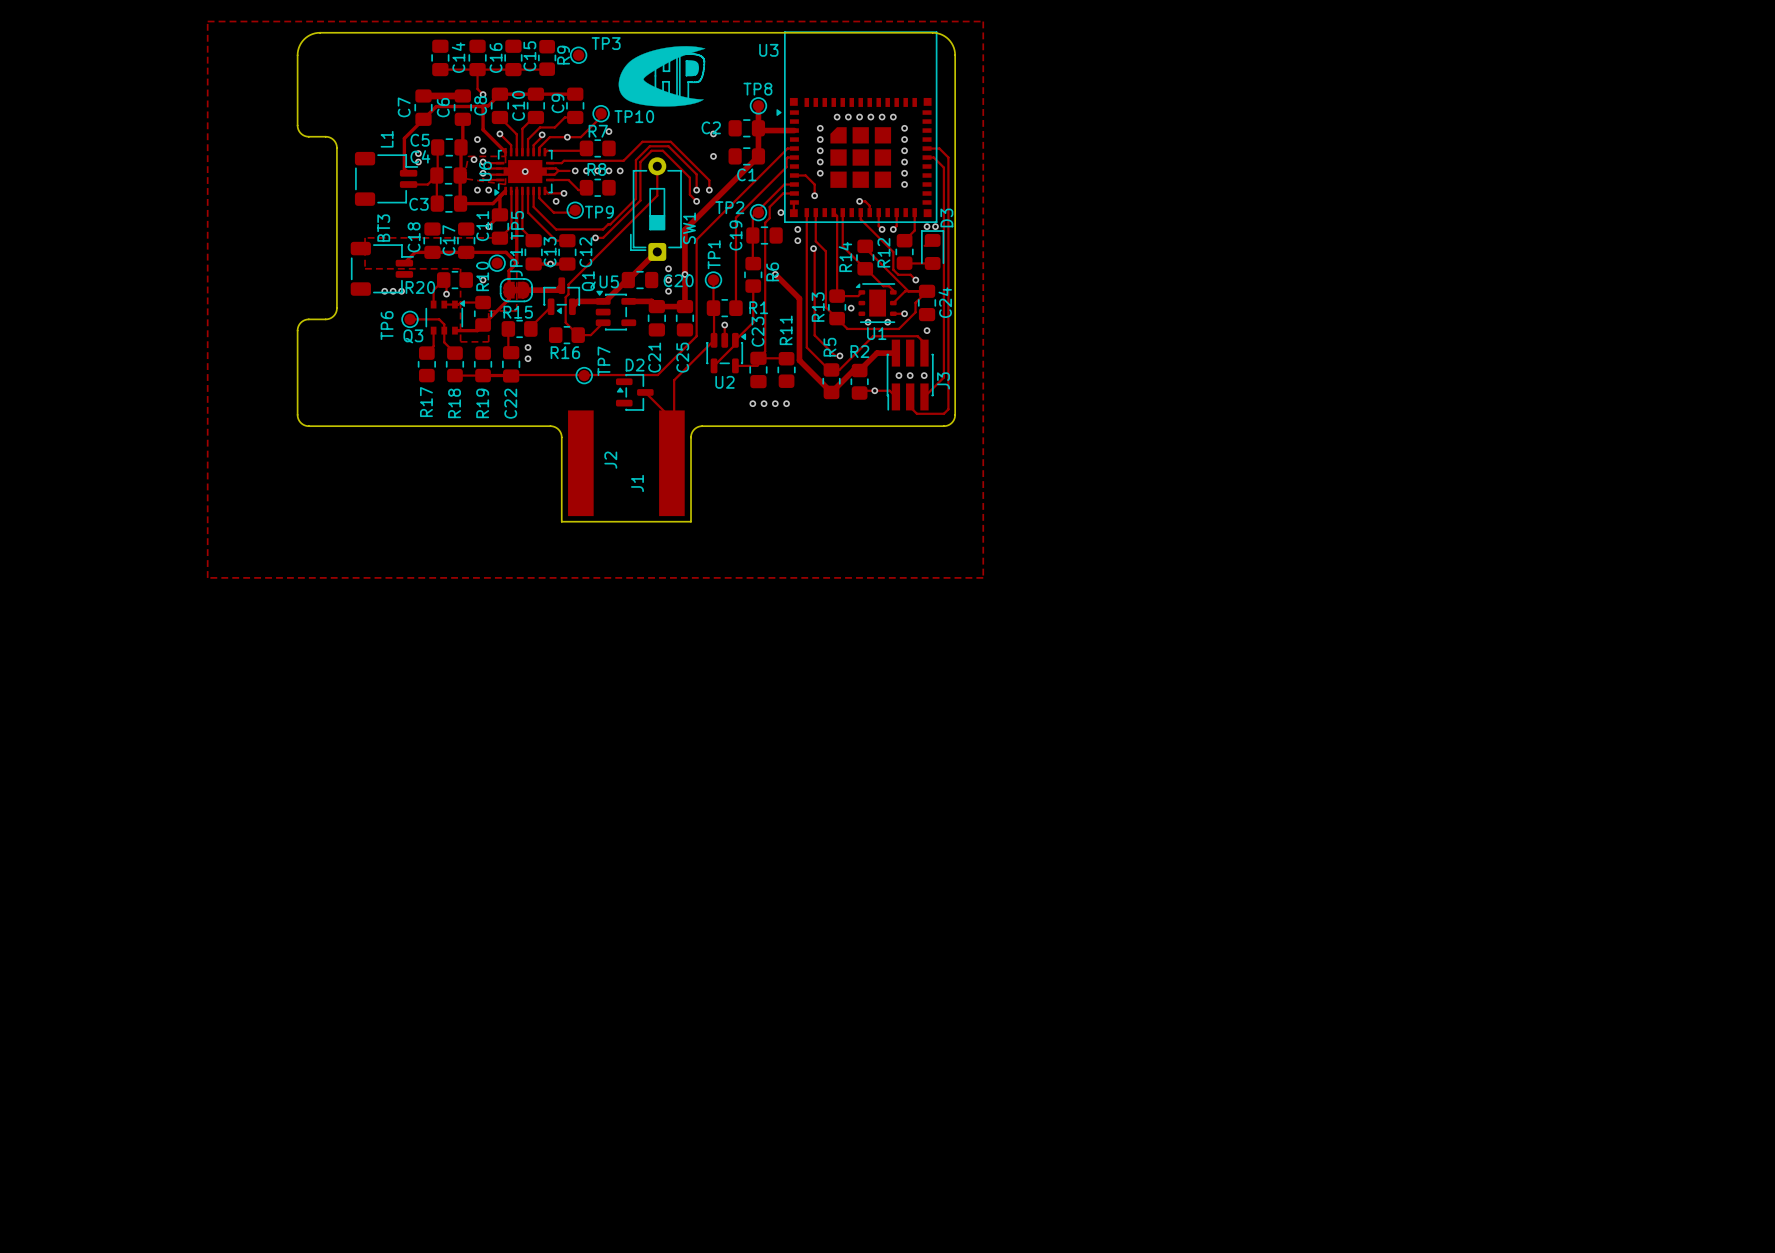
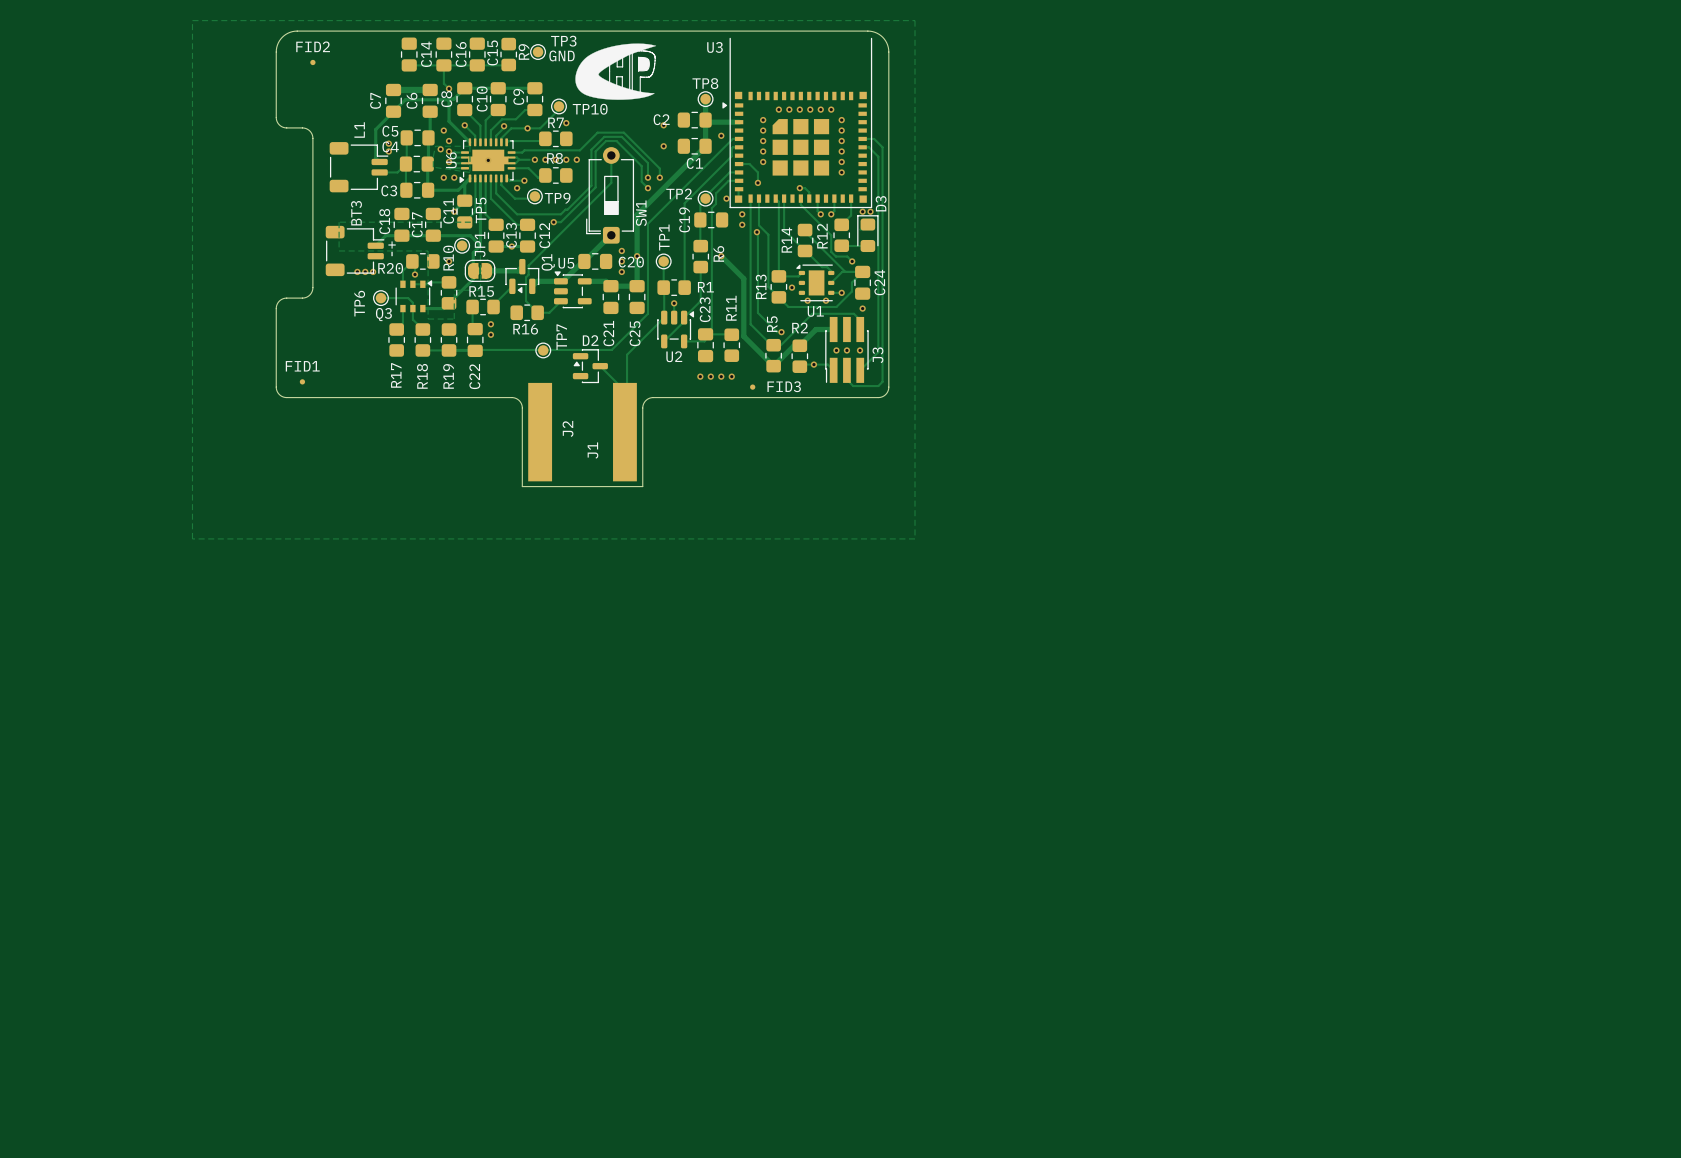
U3 footprint: [776, 31, 938, 223] -> [722, 37, 873, 209]
text: none -> GND (562, 55)
FID2: none -> (312, 62)
via: none -> (721, 135)
text: none -> +- (392, 248)
FID1: none -> (302, 381)
FID3: none -> (752, 387)

